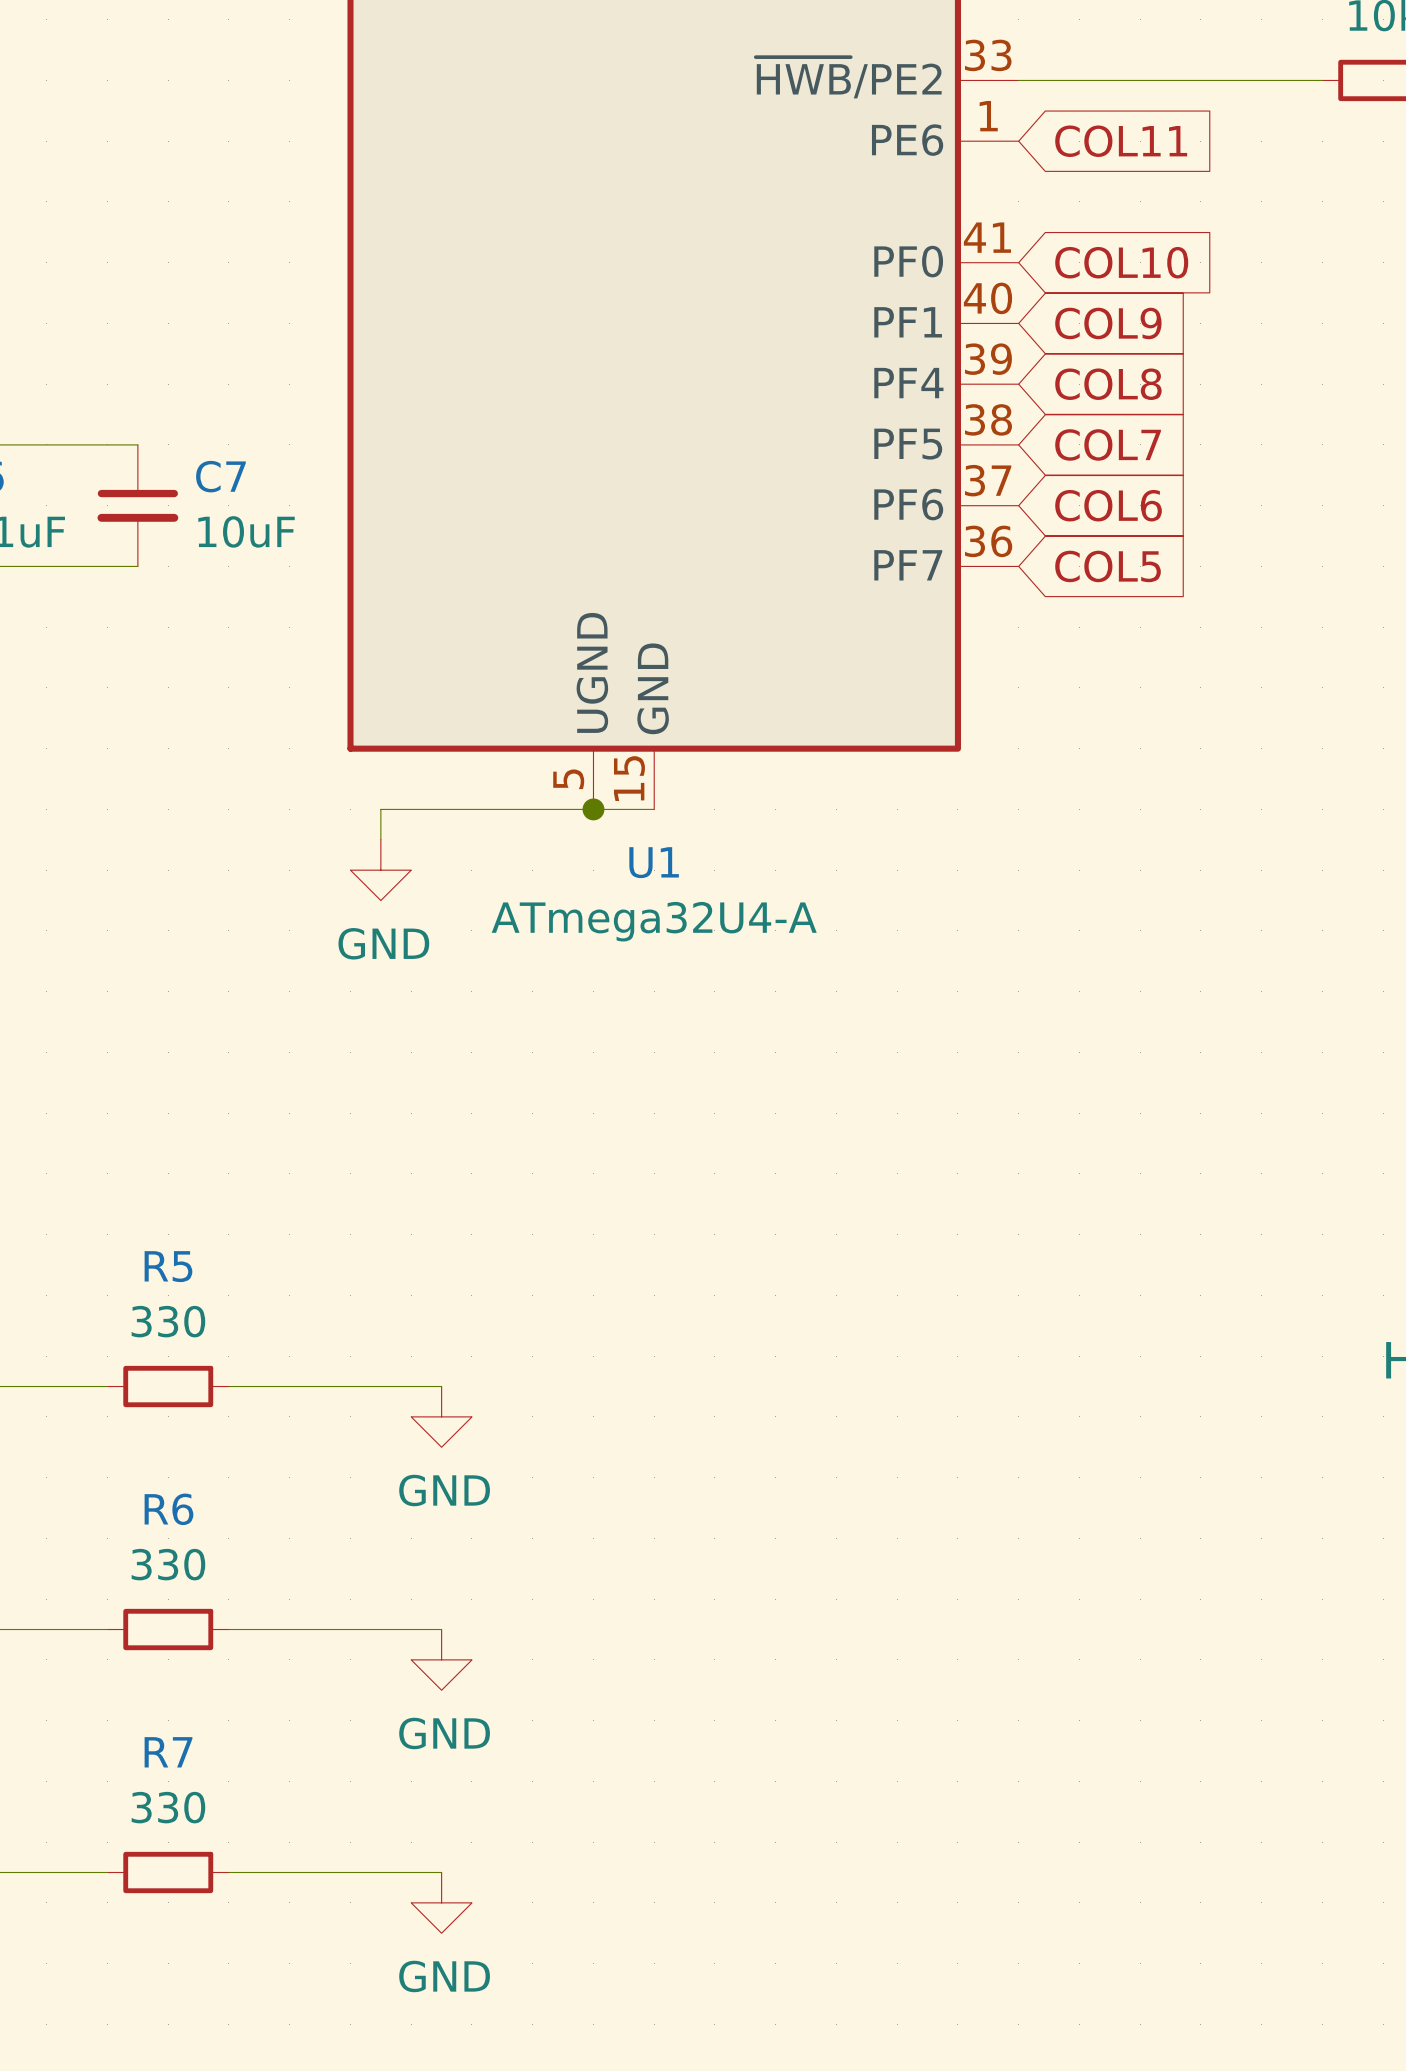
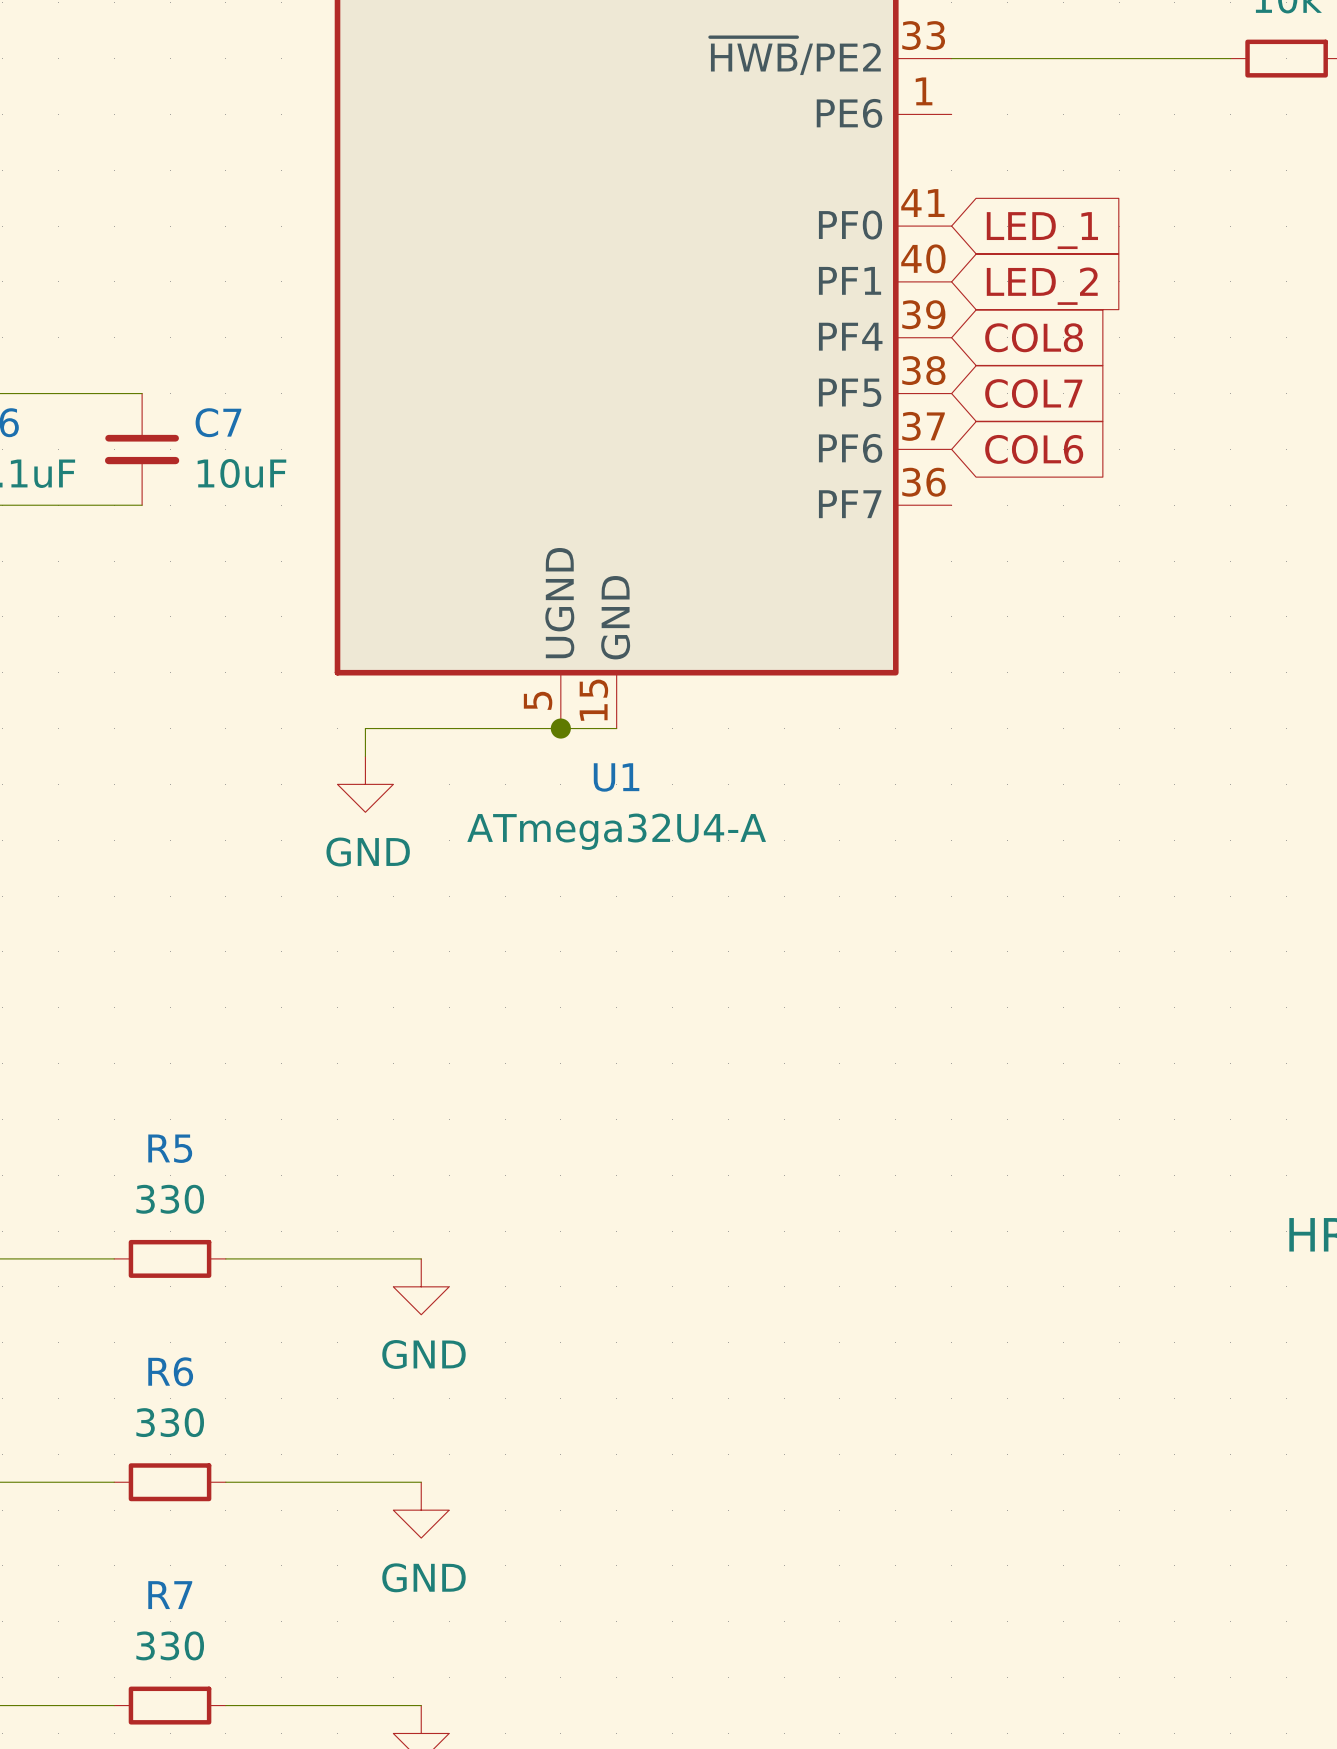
global label: COL11 (1121, 141) -> none
global label: COL10 (1121, 262) -> LED_1 (1042, 230)
global label: COL9 (1108, 323) -> LED_2 (1042, 286)
global label: COL5 (1108, 566) -> none

